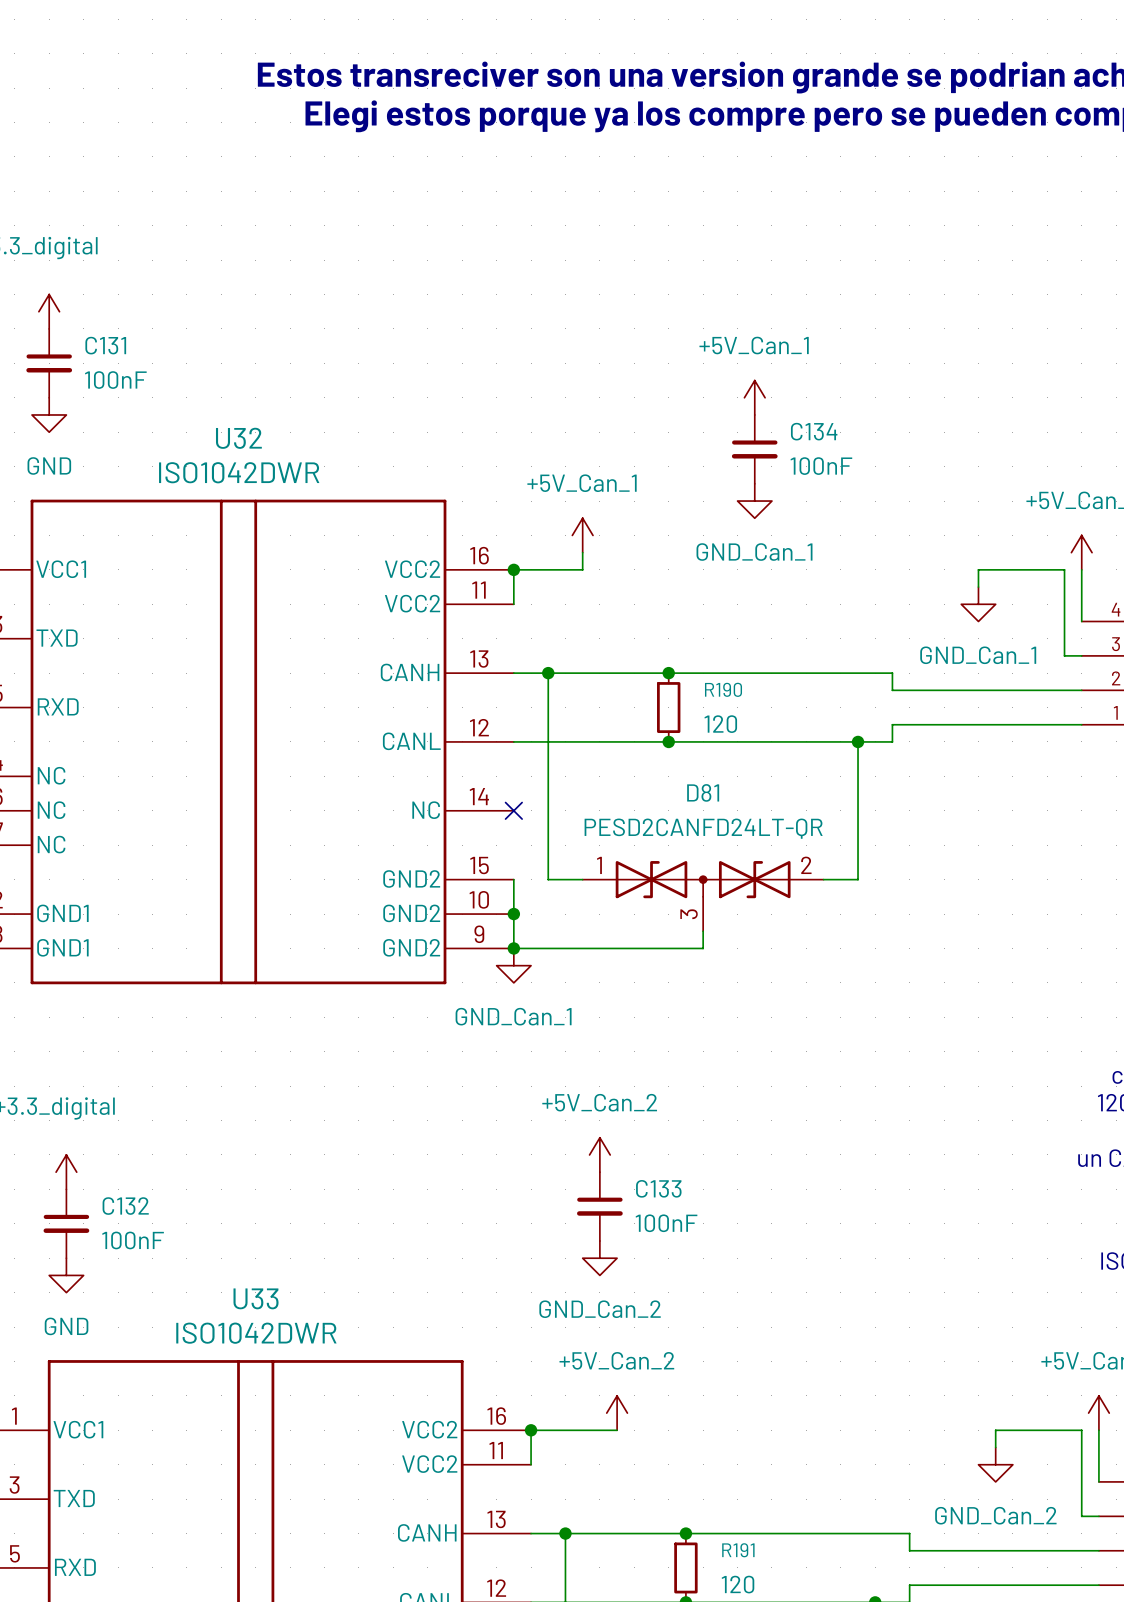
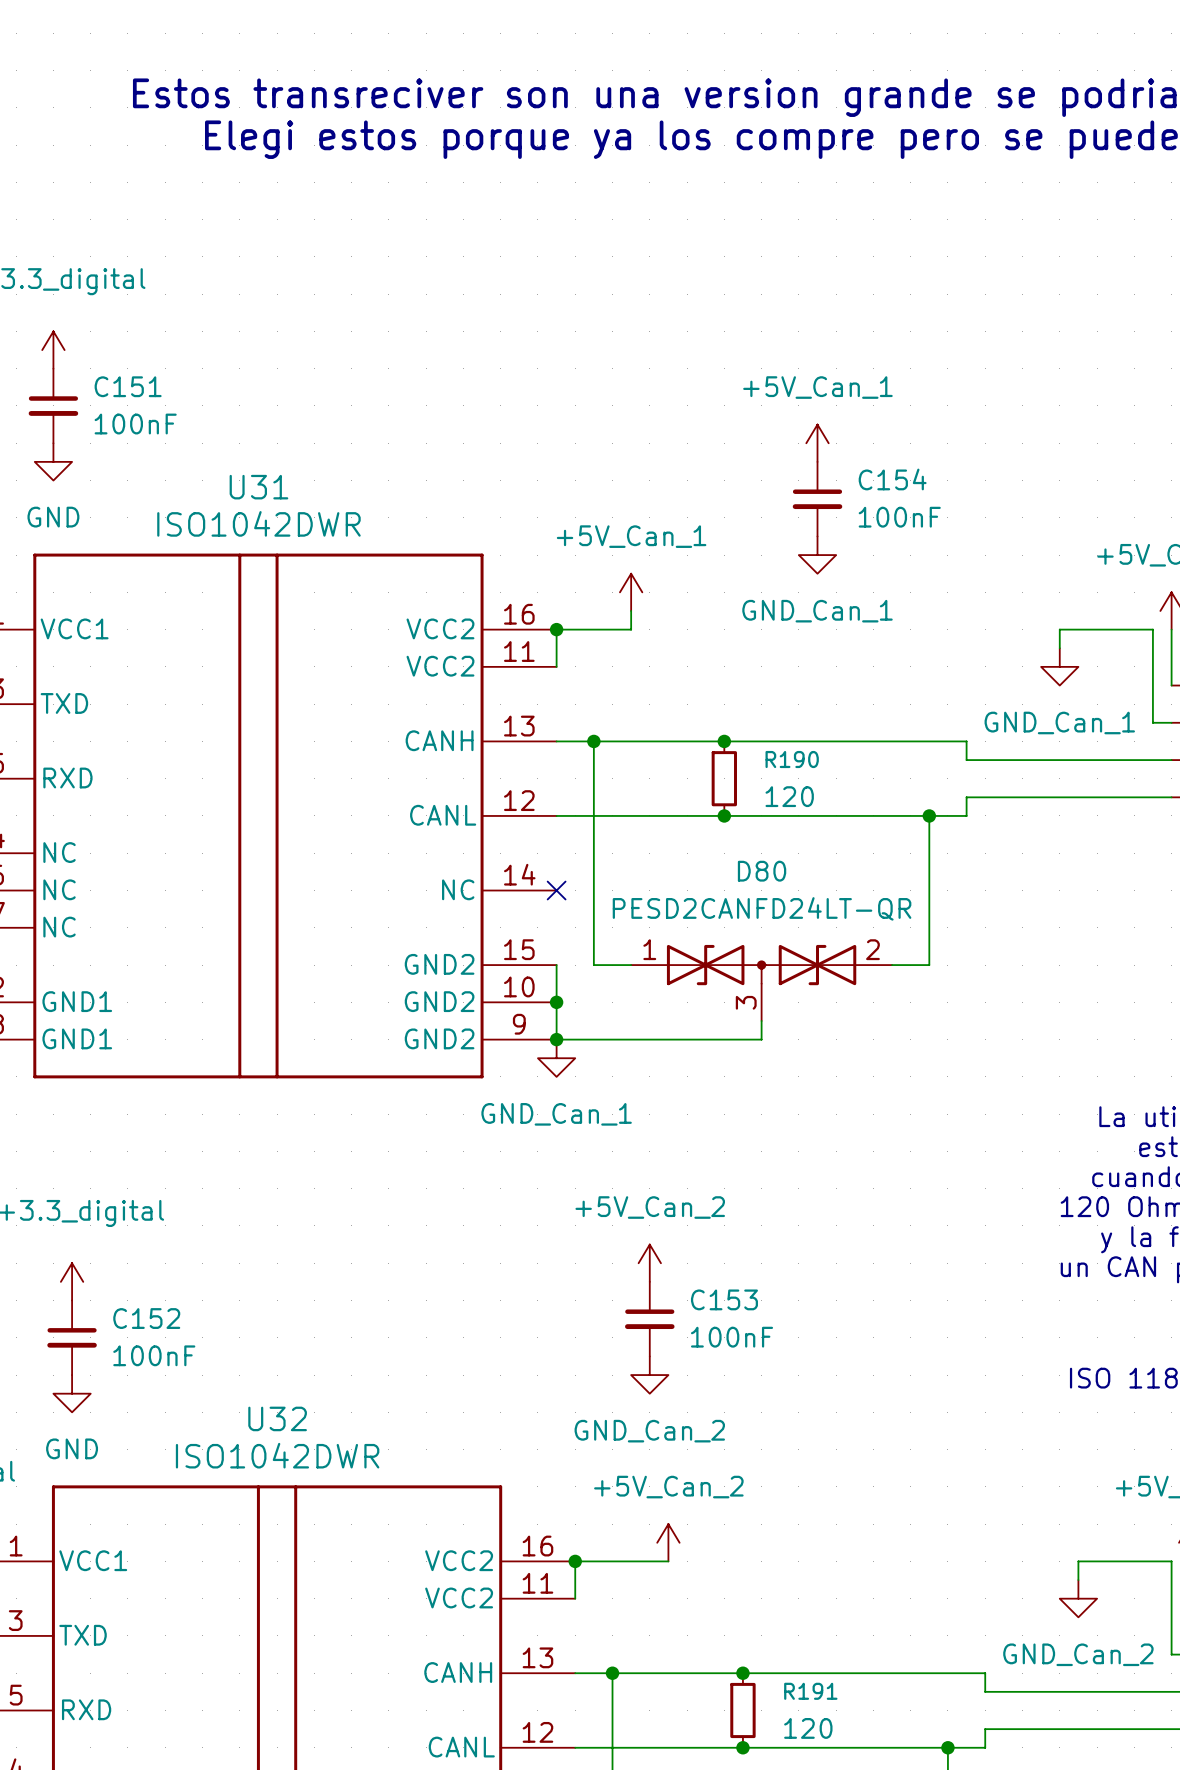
C131 name: C131 (105, 345) -> C151 (128, 386)
C134 name: C134 (814, 431) -> C154 (892, 479)
U32 name: U32 (238, 438) -> U31 (258, 487)
D81 name: D81 (703, 792) -> D80 (762, 871)
C133 name: C133 (658, 1188) -> C153 (724, 1299)
C132 name: C132 (125, 1206) -> C152 (146, 1318)
U33 name: U33 (256, 1298) -> U32 (277, 1418)

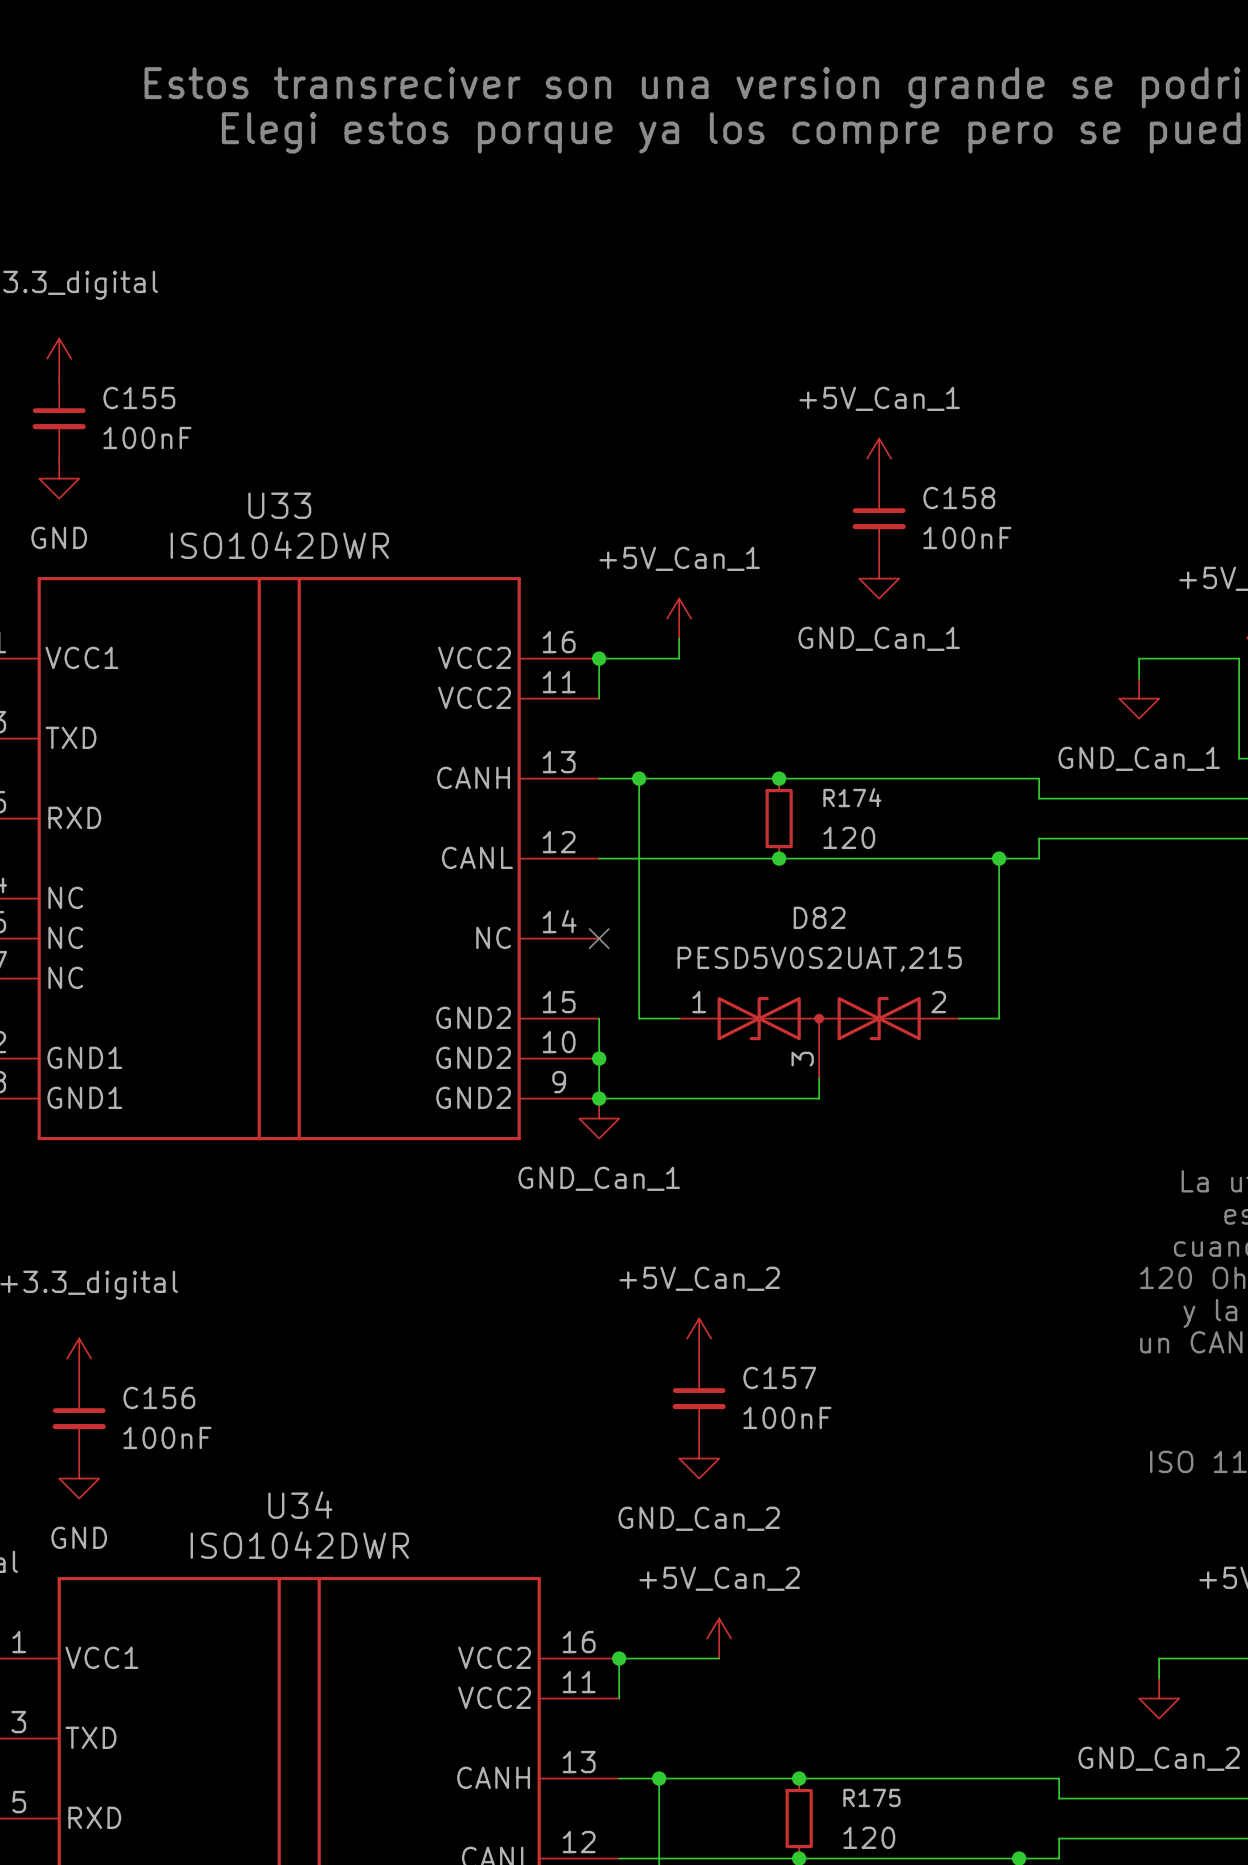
C151 name: C151 (128, 386) -> C155 (139, 397)
C154 name: C154 (892, 479) -> C158 (959, 497)
U31 name: U31 (258, 487) -> U33 (279, 505)
R190 name: R190 (792, 759) -> R174 (852, 797)
D80 name: D80 (762, 871) -> D82 (819, 917)
D80 value: PESD2CANFD24LT-QR (762, 908) -> PESD5V0S2UAT,215 (819, 959)
C153 name: C153 (724, 1299) -> C157 (779, 1377)
C152 name: C152 (146, 1318) -> C156 (159, 1397)
U32 name: U32 (277, 1418) -> U34 (300, 1505)
R191 name: R191 (810, 1691) -> R175 (871, 1797)

